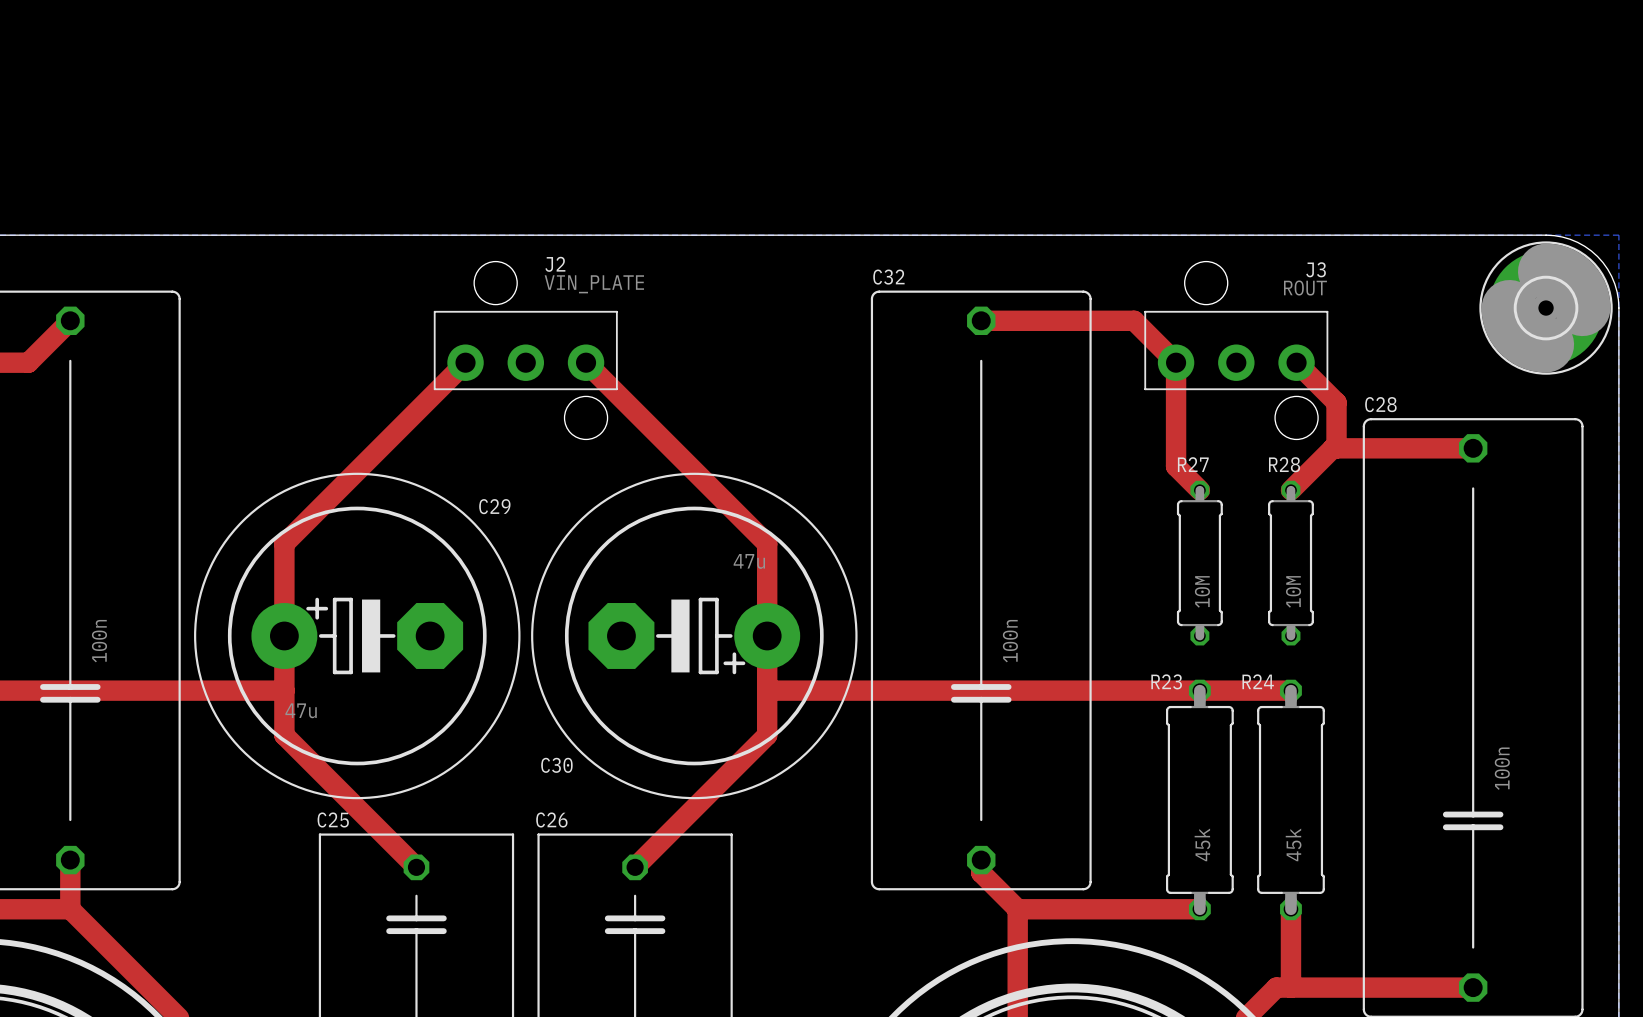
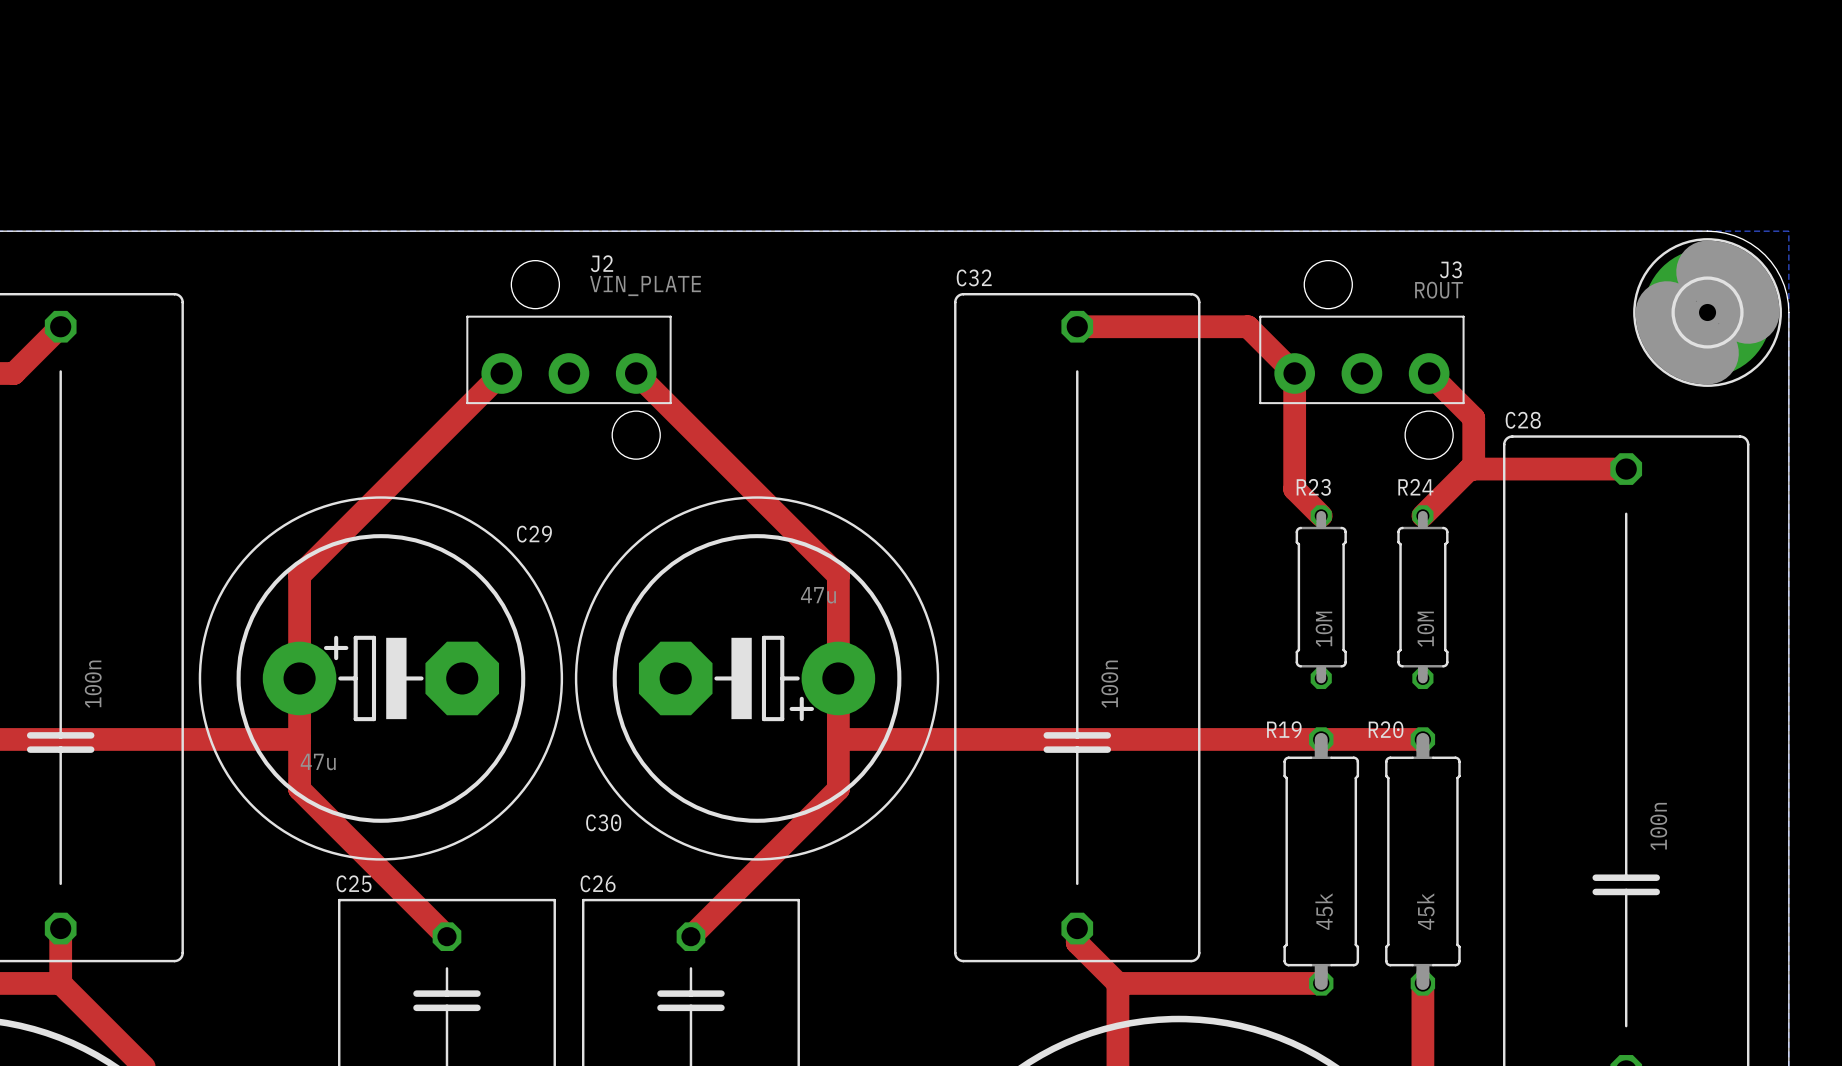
R27 name: R27 (1193, 464) -> R23 (1313, 487)
R28 name: R28 (1284, 464) -> R24 (1415, 487)
R23 name: R23 (1166, 681) -> R19 (1284, 729)
R24 name: R24 (1258, 681) -> R20 (1386, 729)

